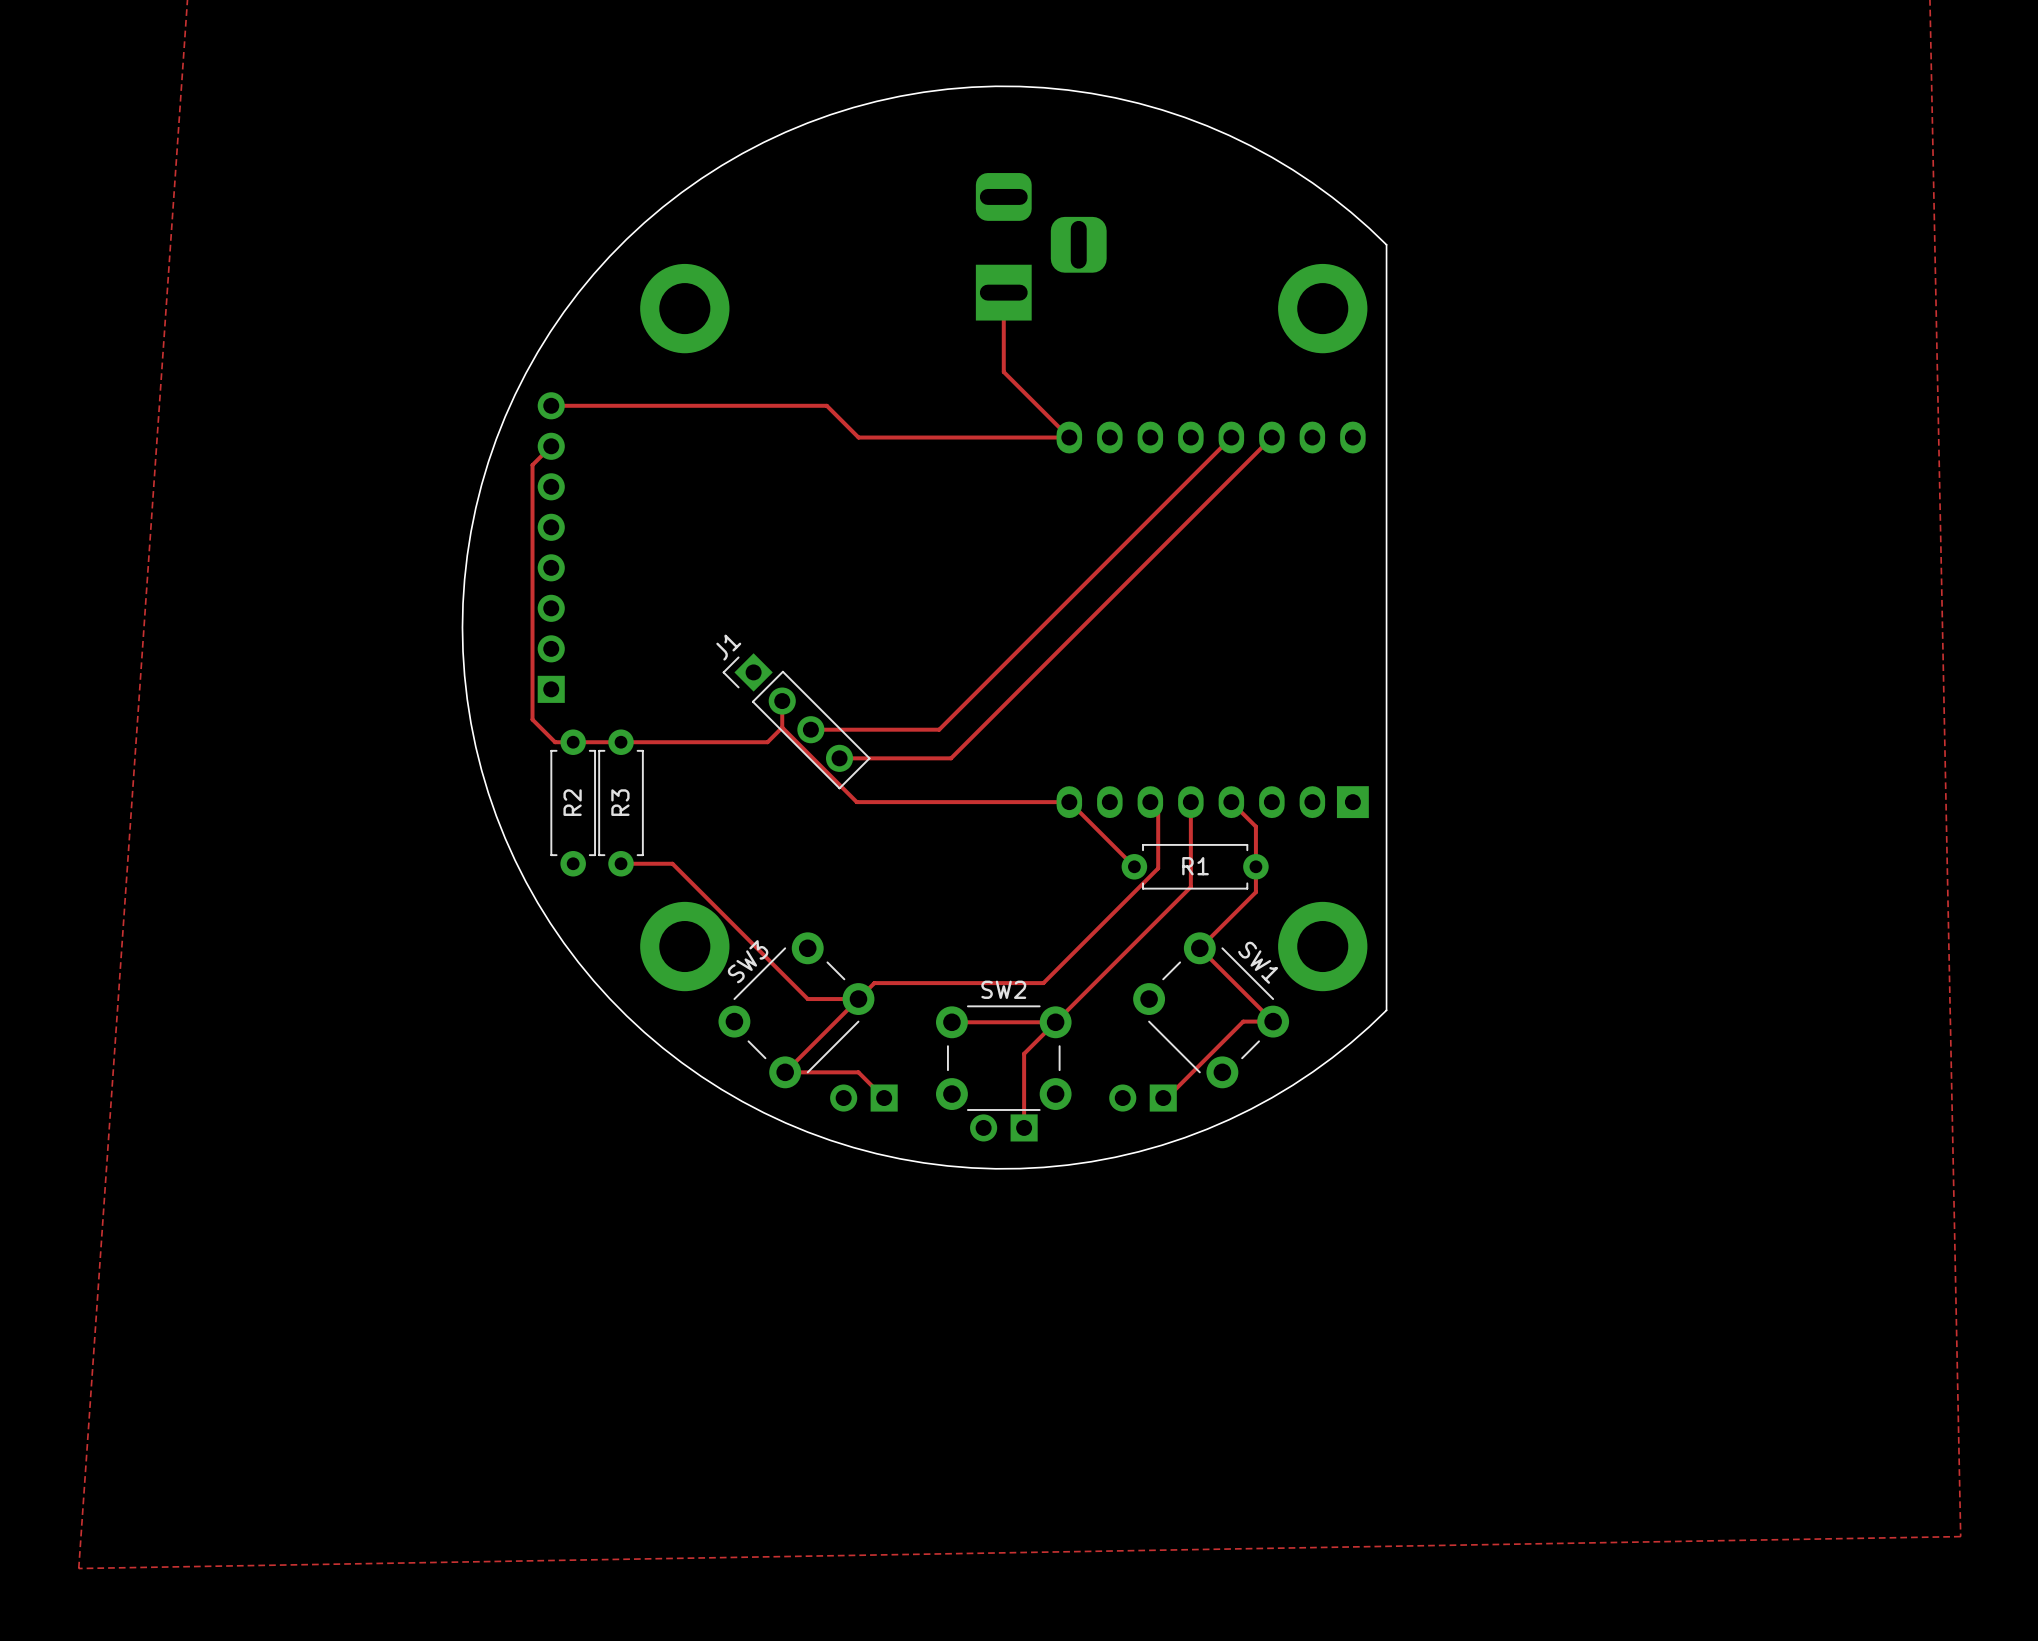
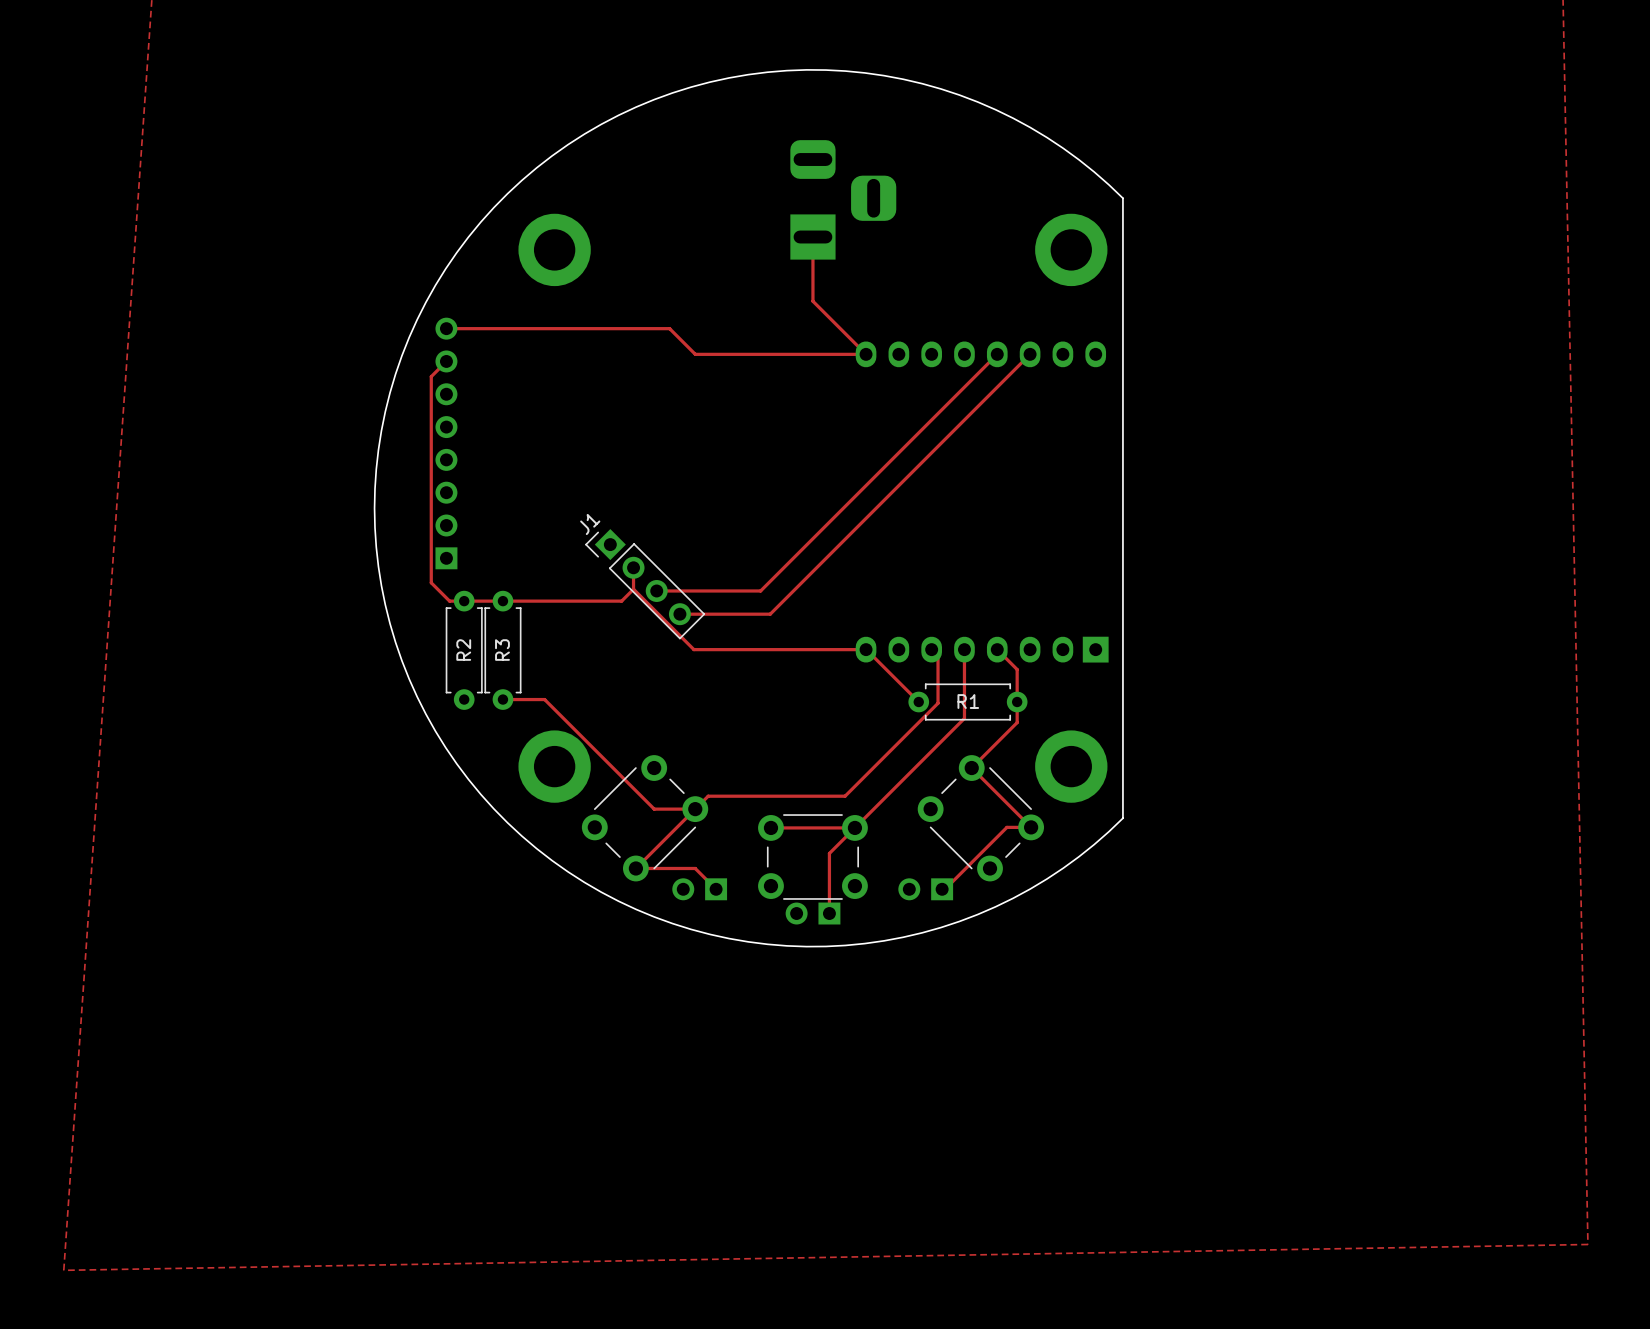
SW3 name: SW3 (748, 961) -> none
SW1 name: SW1 (1258, 962) -> none
SW2 name: SW2 (1003, 989) -> none

